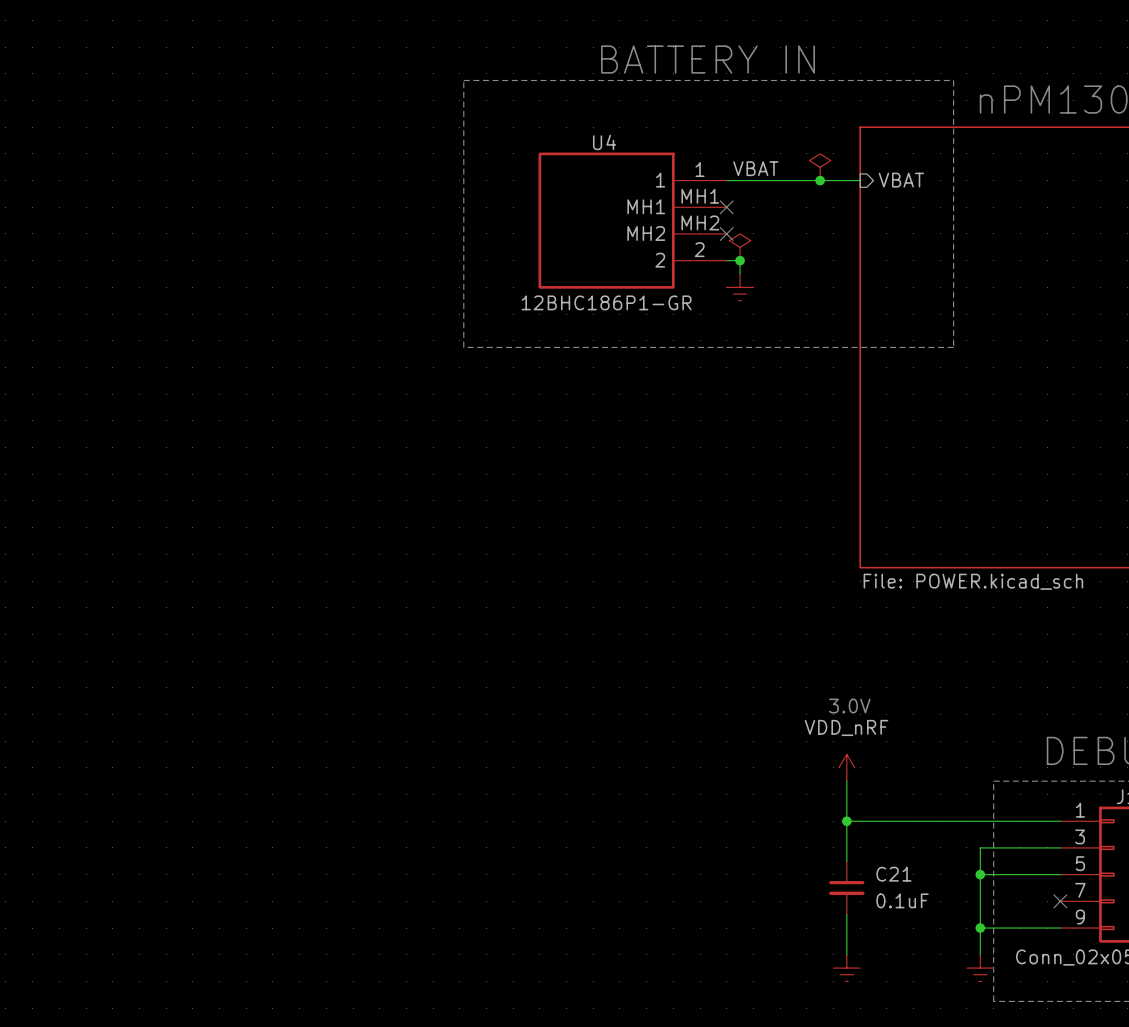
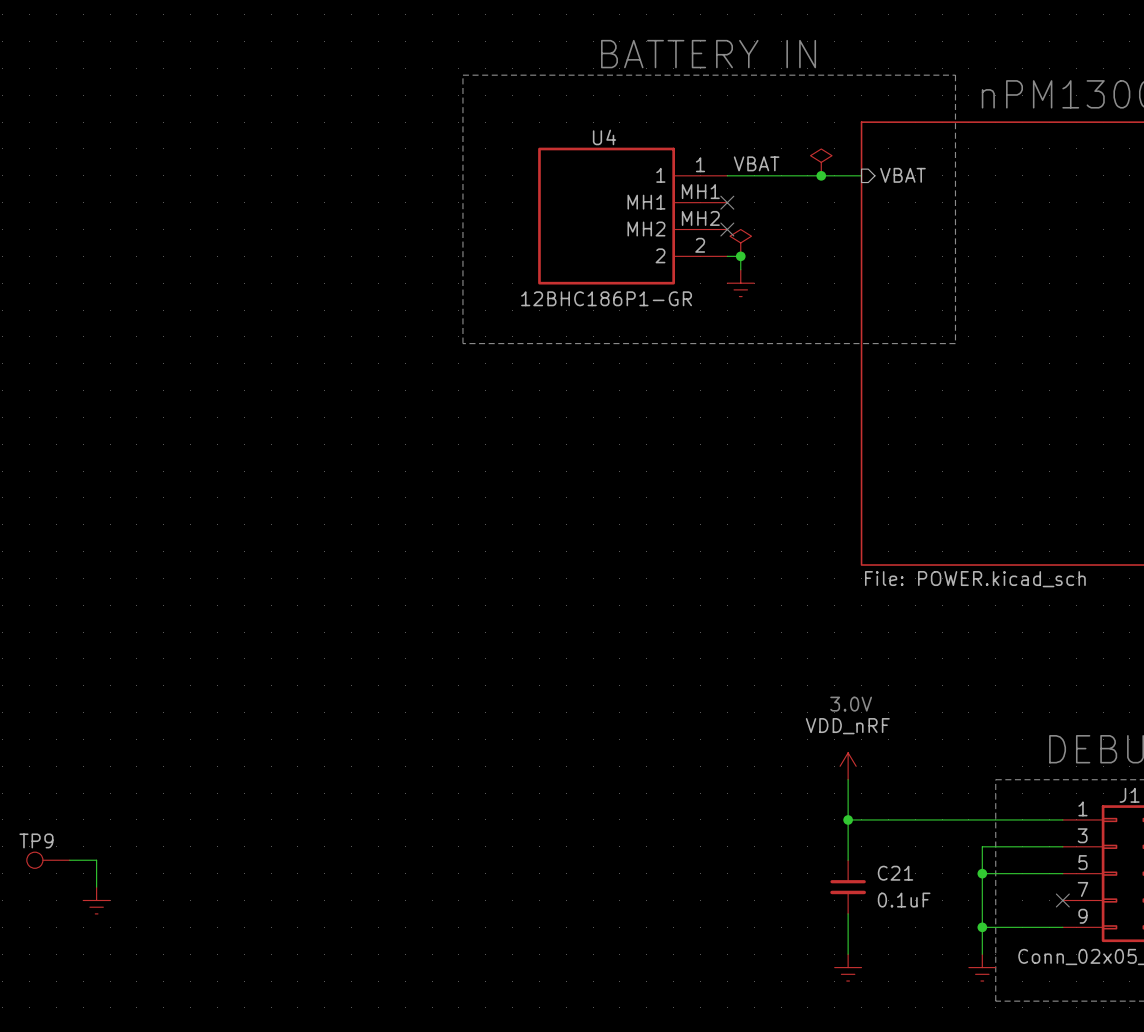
TP9: none -> (48, 860)
wire: none -> (69, 860) (96, 860) (96, 887)
power symbol: none -> (96, 900)

